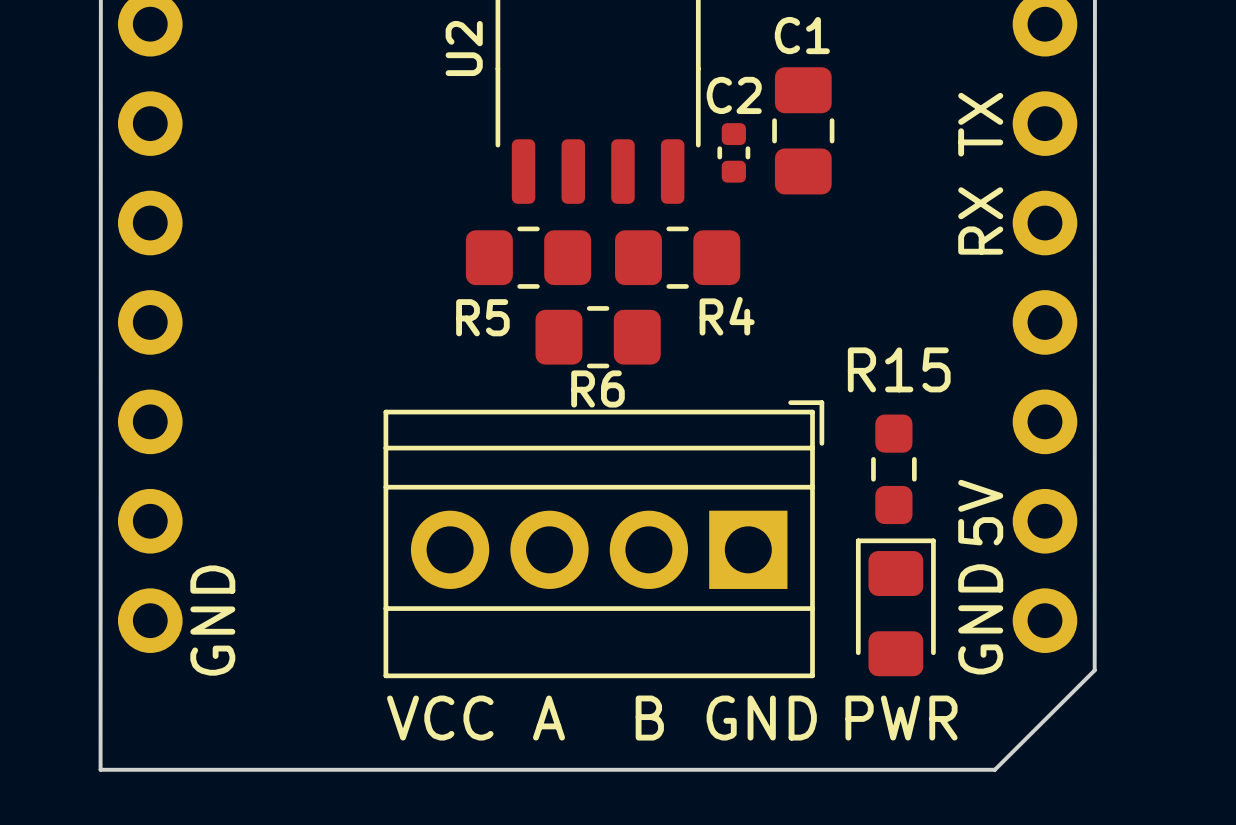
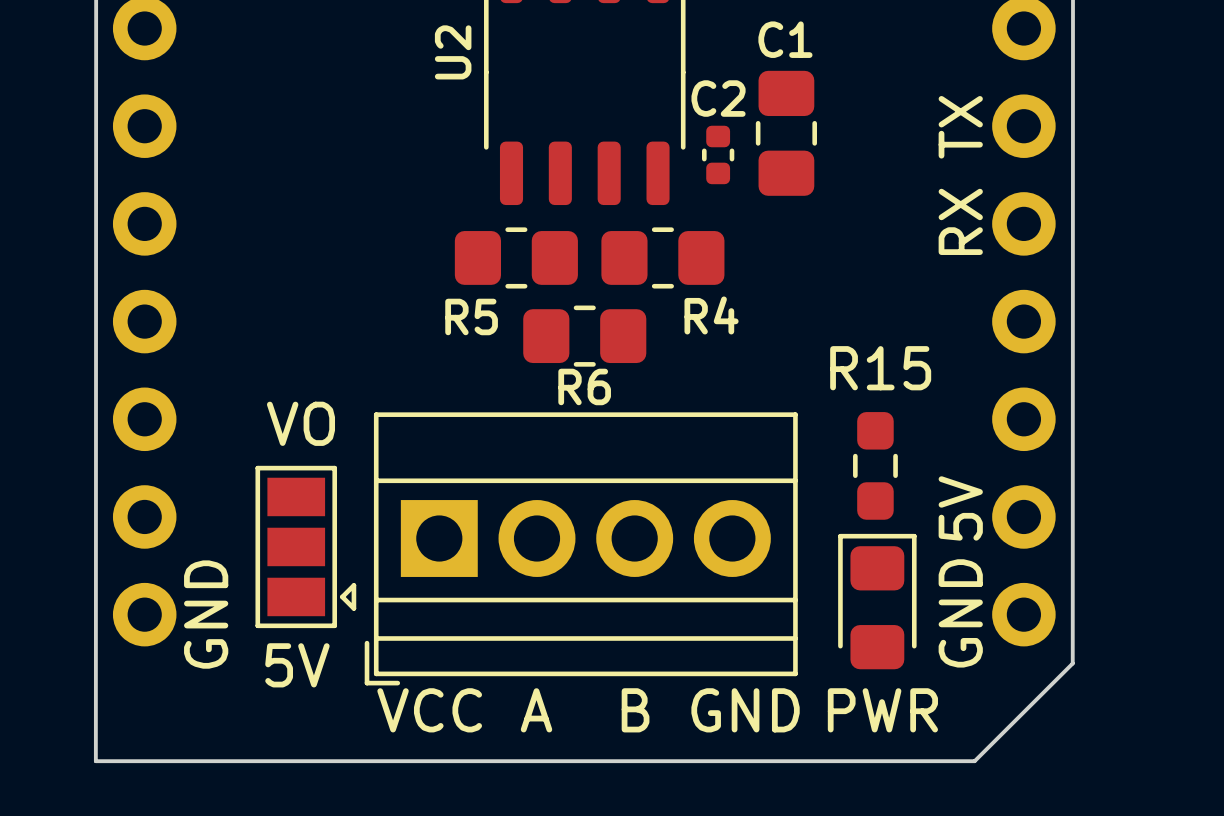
text: none -> VO (300, 423)
part rotation: 0° (603, 539) -> 180° (581, 548)
part: none -> (305, 546)
text: none -> 5V (297, 665)

